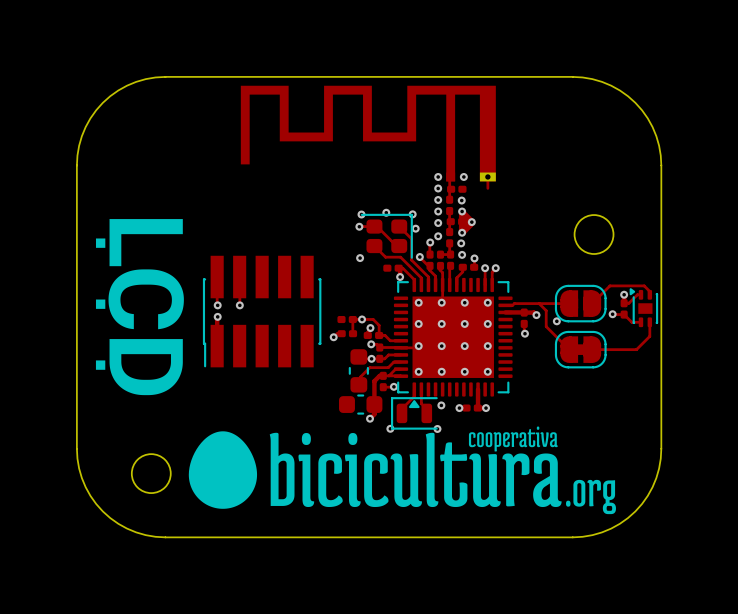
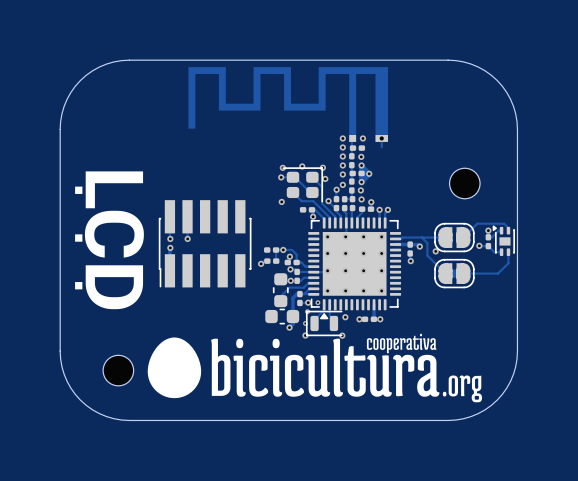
via: none -> (317, 302)
via: none -> (307, 311)
via: none -> (305, 323)

